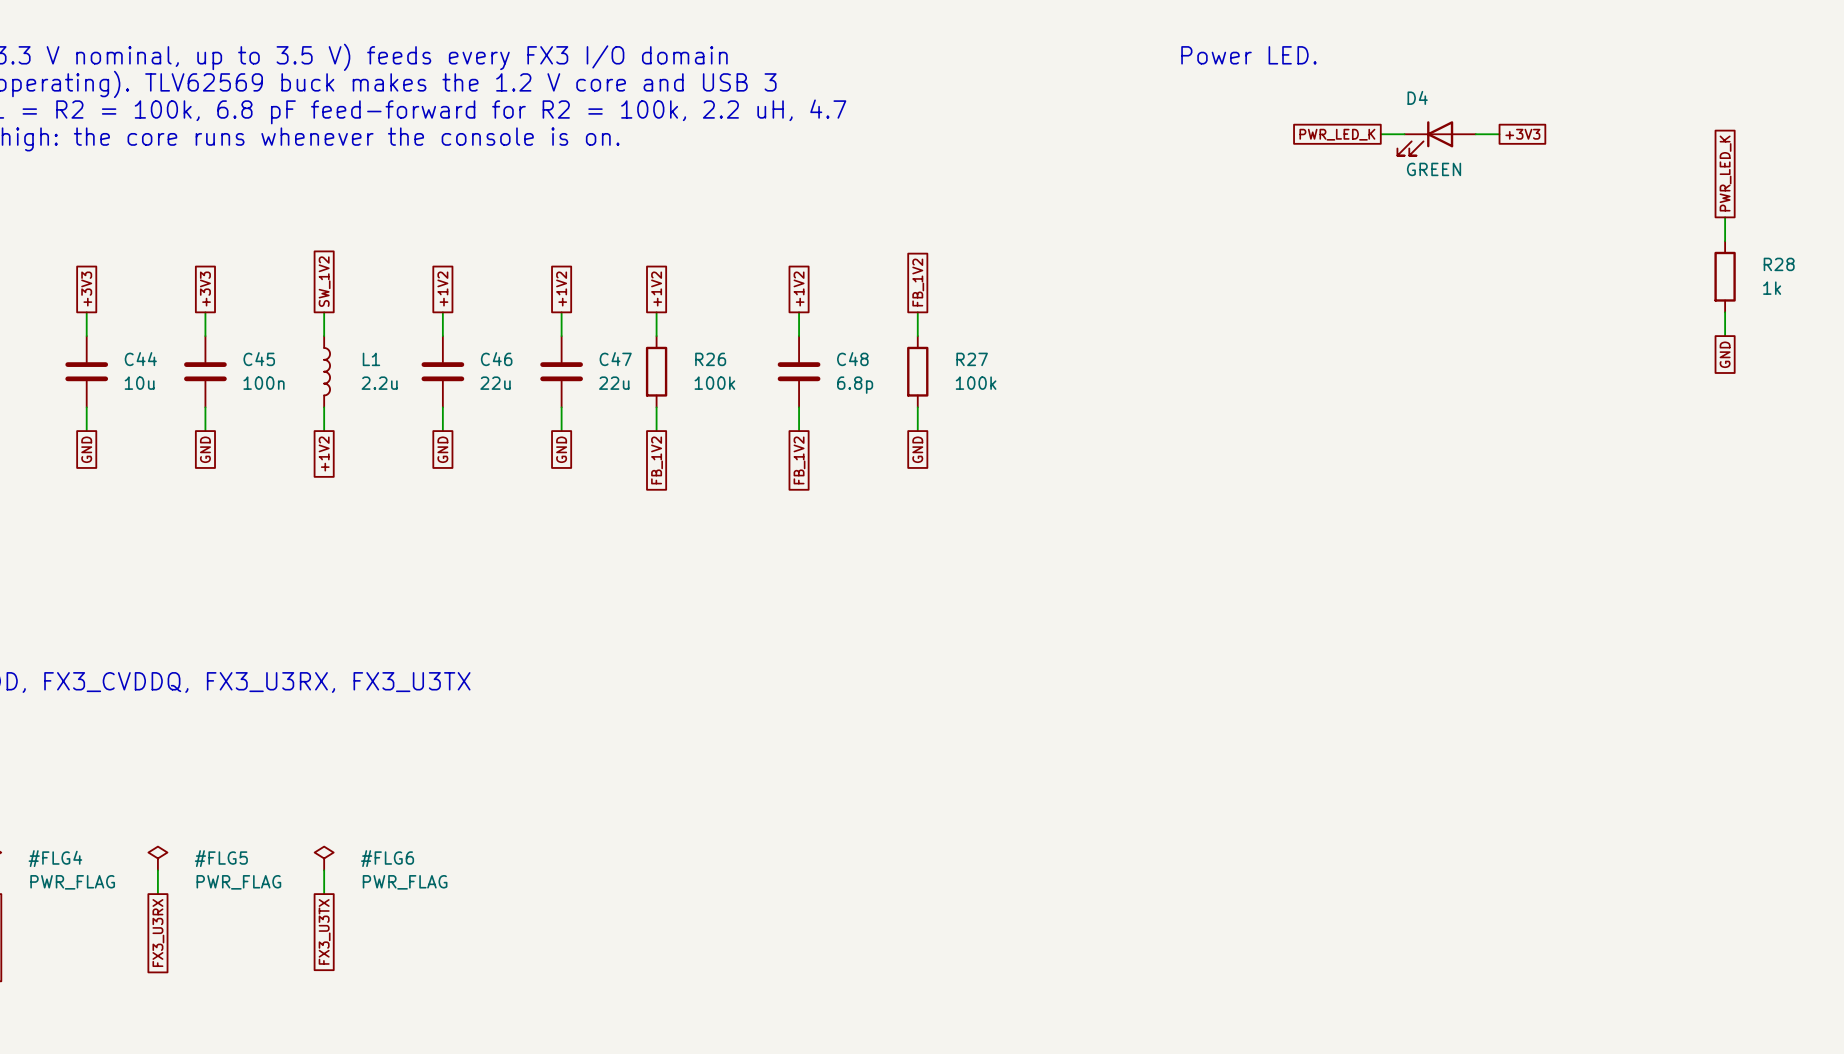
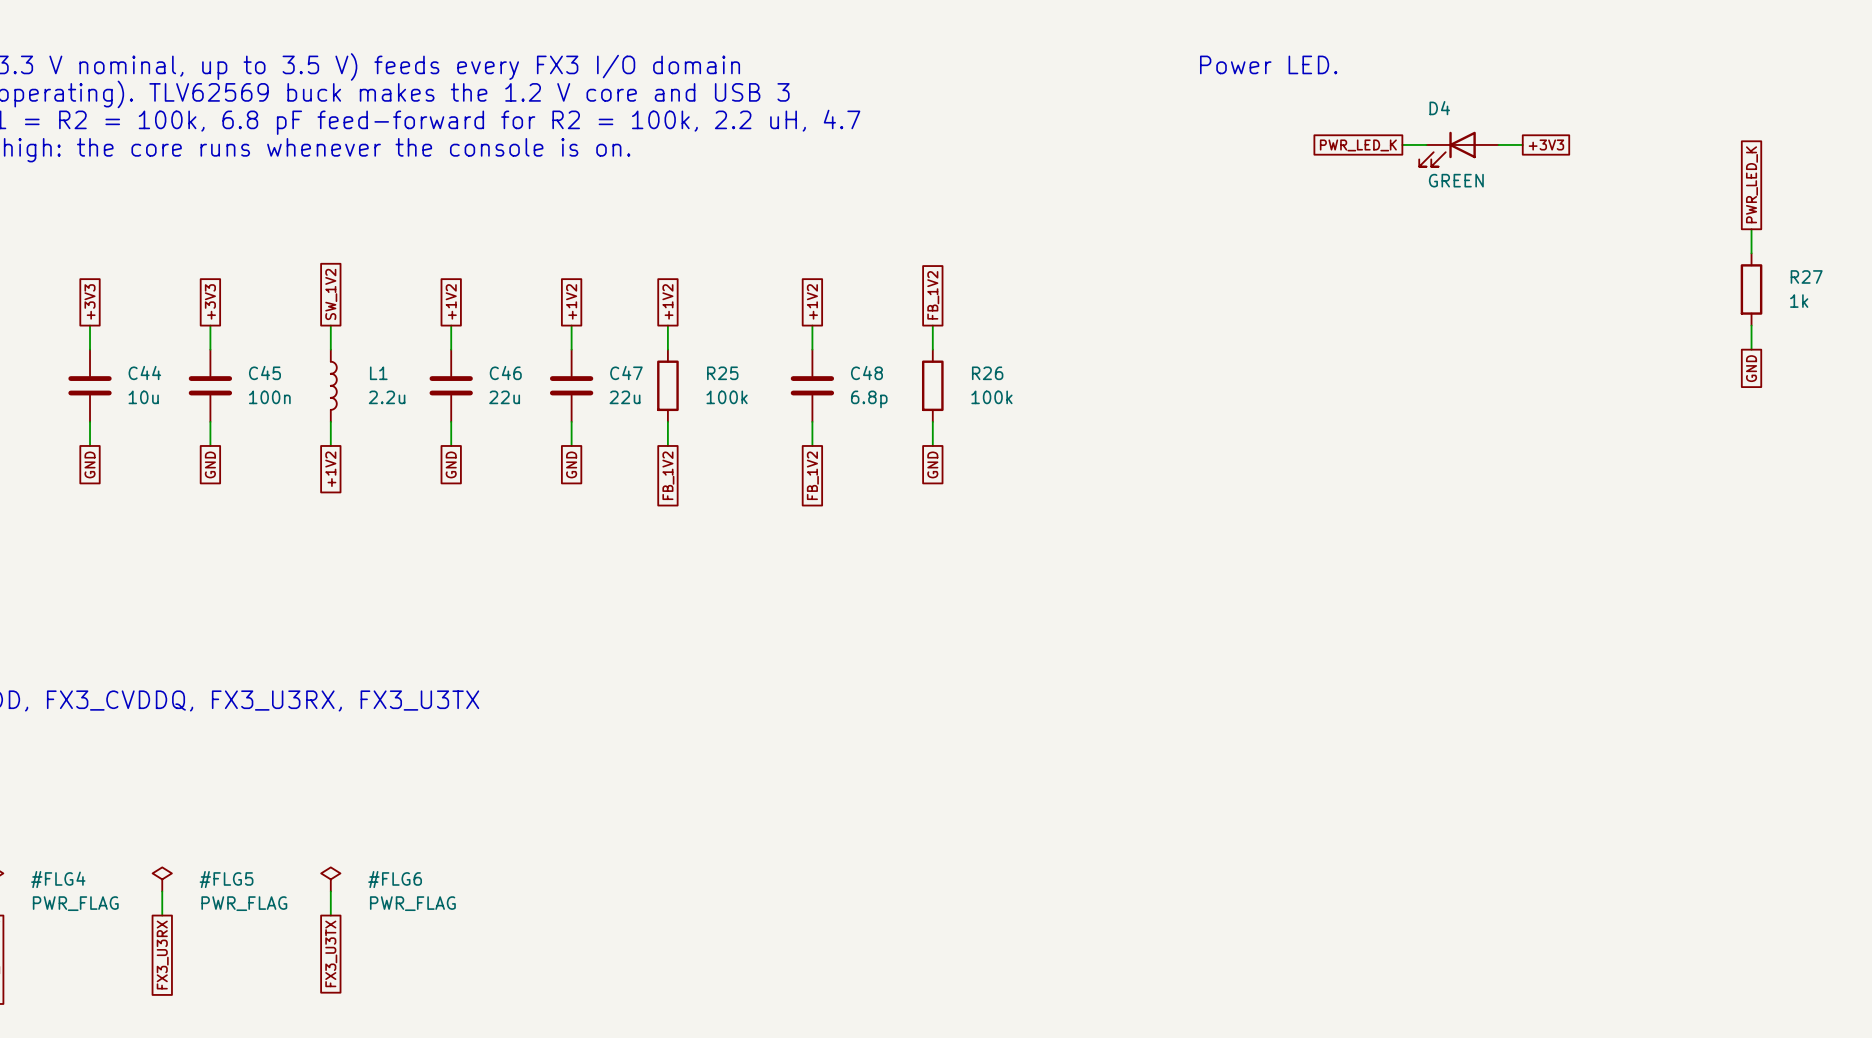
R28 name: R28 (1779, 264) -> R27 (1806, 276)
R26 name: R26 (710, 359) -> R25 (722, 373)
R27 name: R27 (972, 359) -> R26 (987, 373)

